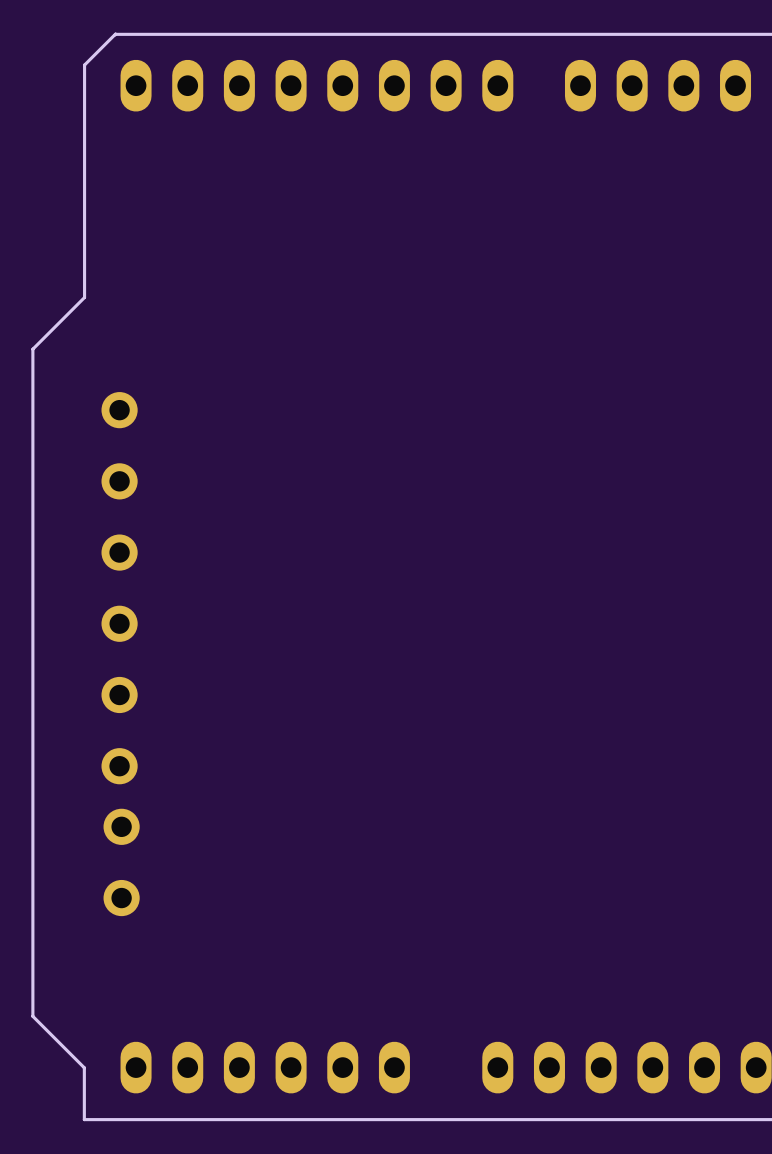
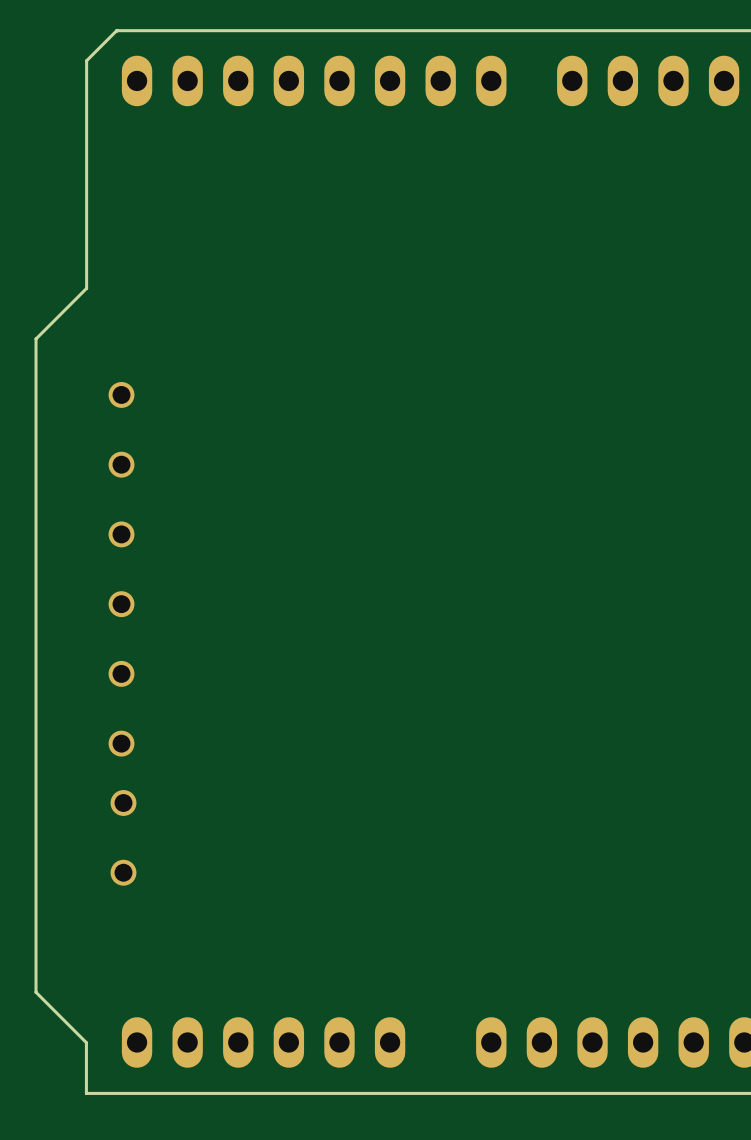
part footprint: [101, 392, 140, 917] -> [108, 382, 137, 886]

